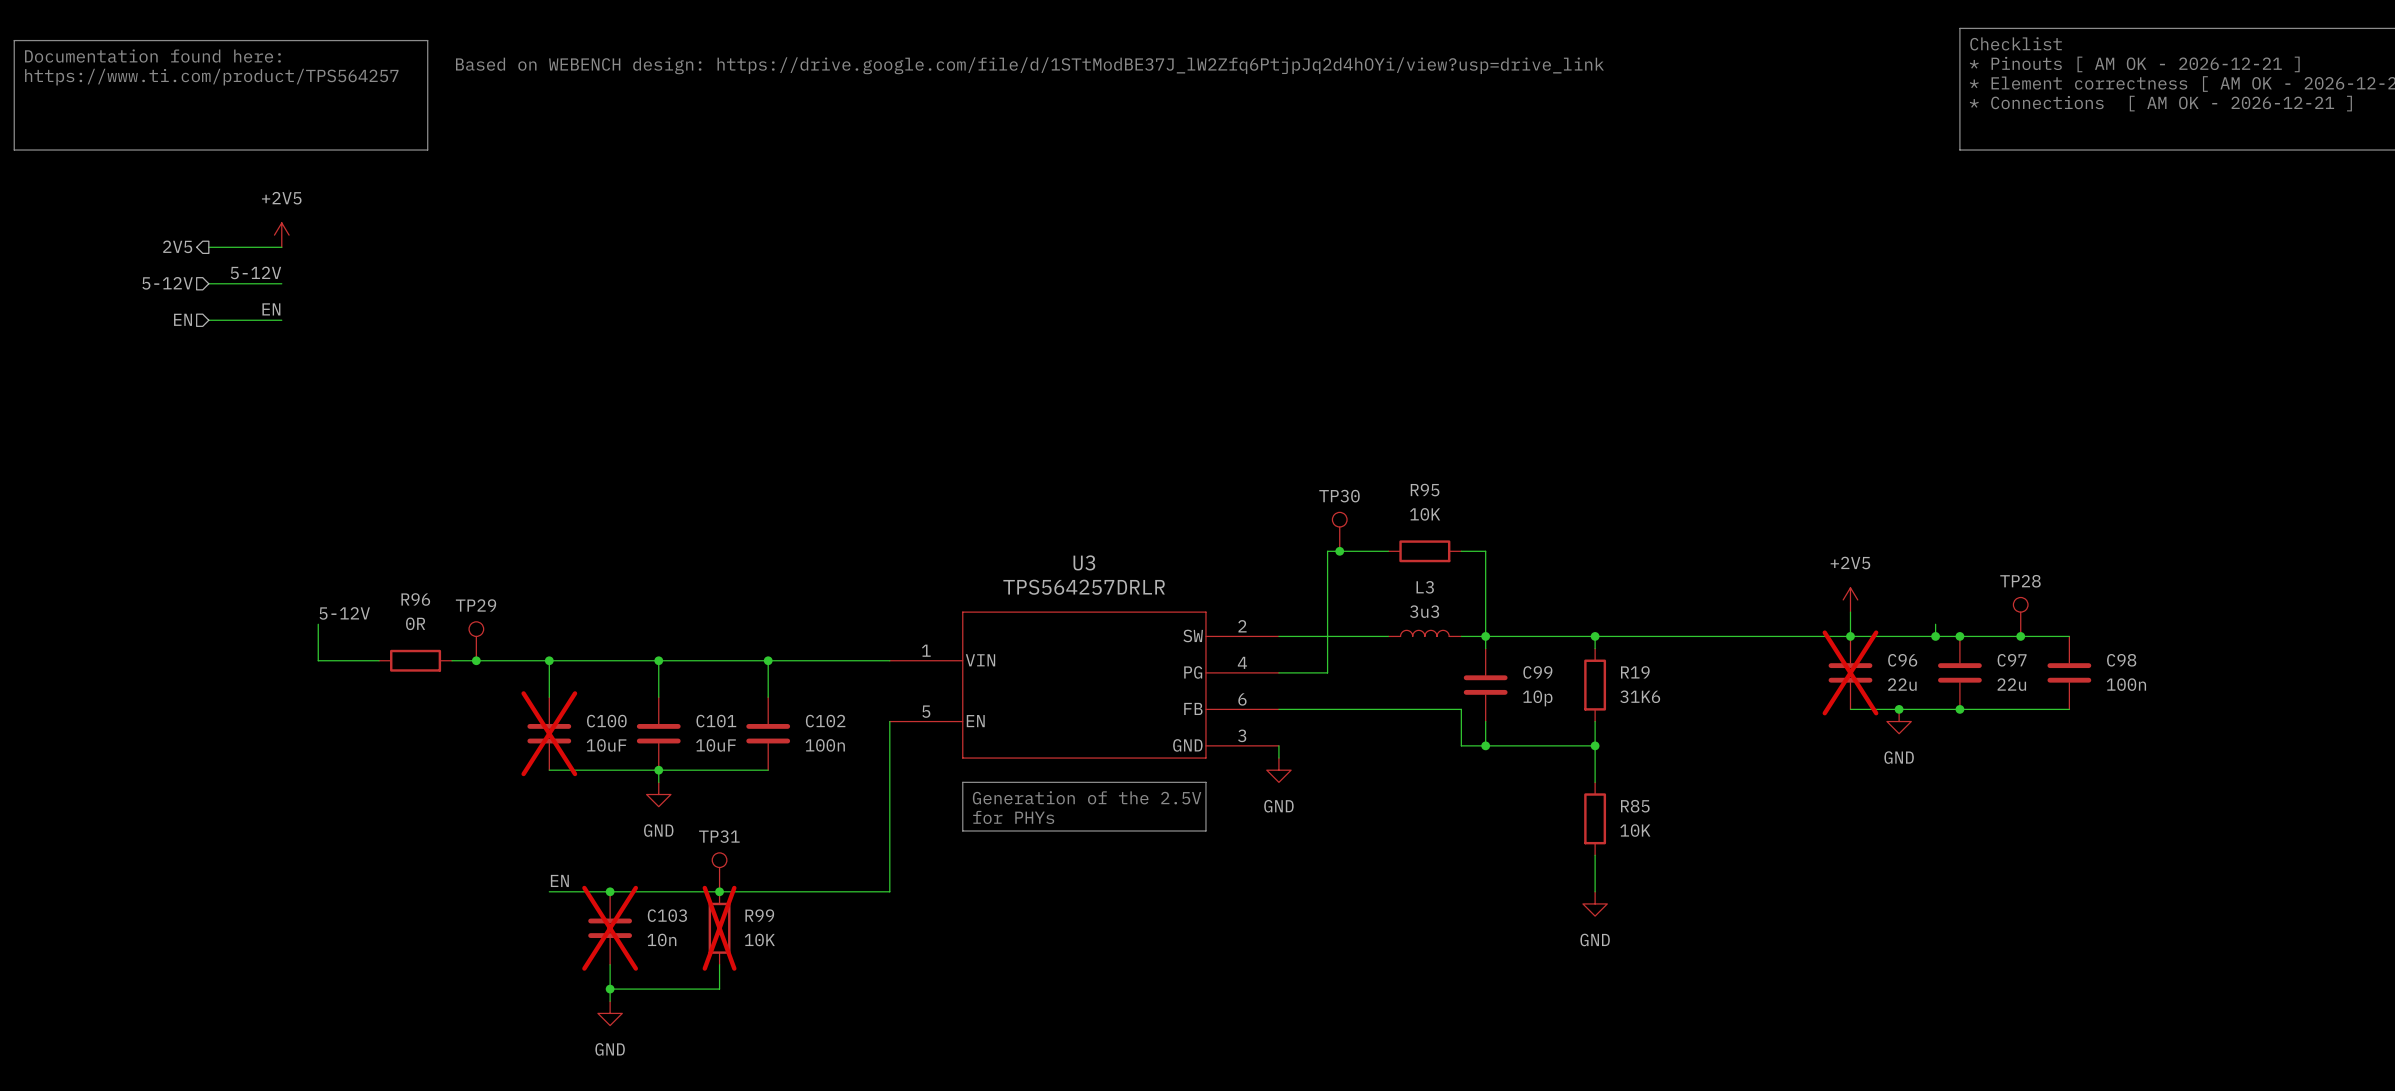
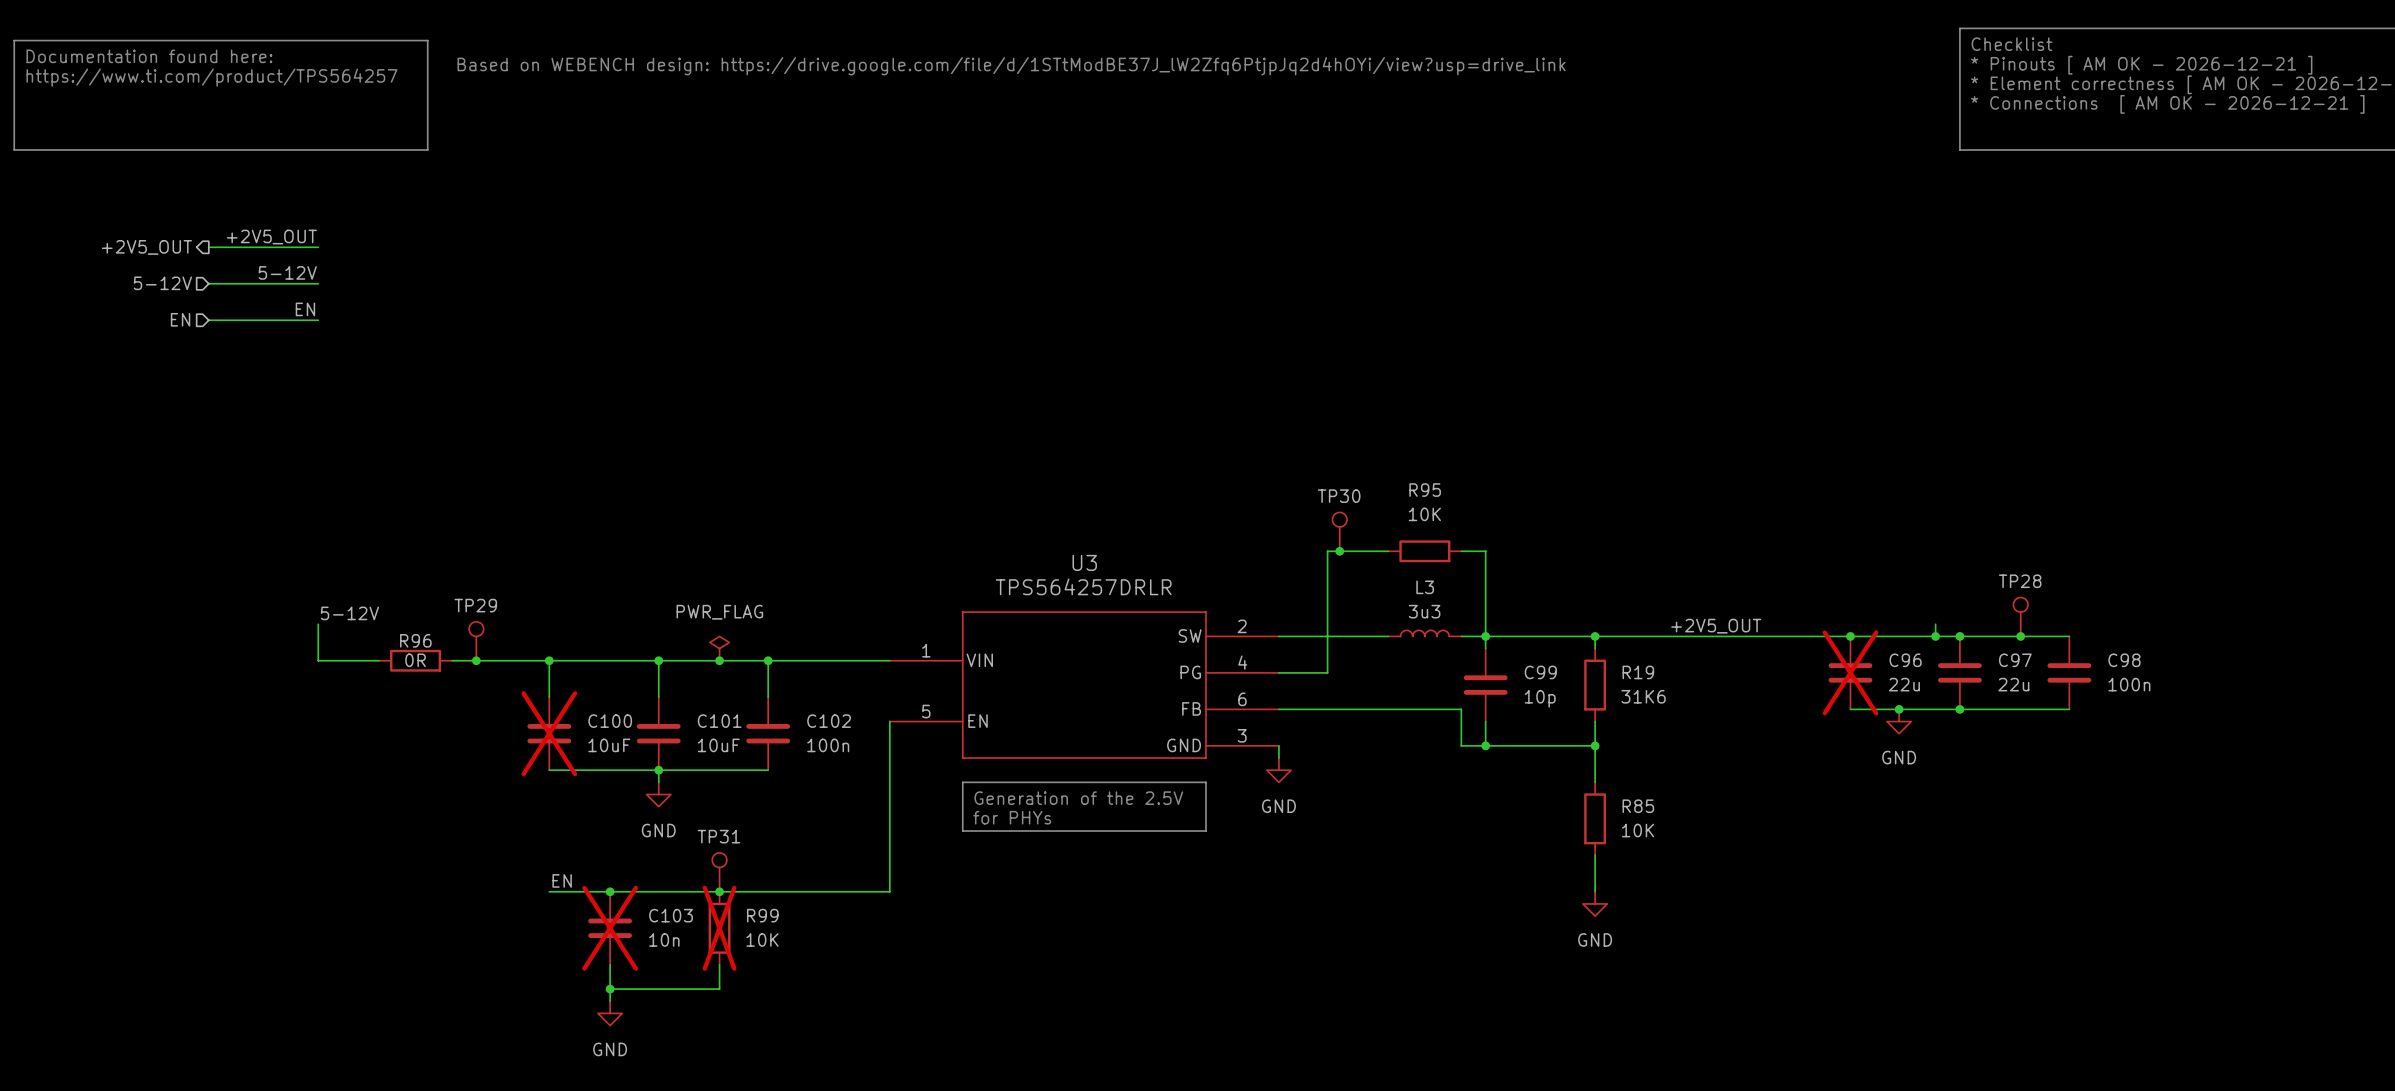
power symbol: +2V5 (281, 235) -> none
label: none -> +2V5_OUT (271, 237)
hierarchical label: 2V5 (177, 246) -> +2V5_OUT (146, 247)
wire: none -> (281, 247) (318, 247)
label position: 5-12V (255, 272) -> 5-12V (287, 272)
wire: none -> (281, 283) (318, 283)
label position: EN (271, 309) -> EN (305, 309)
wire: none -> (281, 320) (318, 320)
R96 name position: R96 (415, 599) -> R96 (415, 640)
power symbol: +2V5 (1850, 599) -> none
wire: (1850, 612) (1850, 636) -> none
R96 value position: 0R (415, 623) -> 0R (415, 660)
label: none -> +2V5_OUT (1716, 626)
power symbol: none -> PWR_FLAG (719, 648)
junction: none -> (719, 660)

